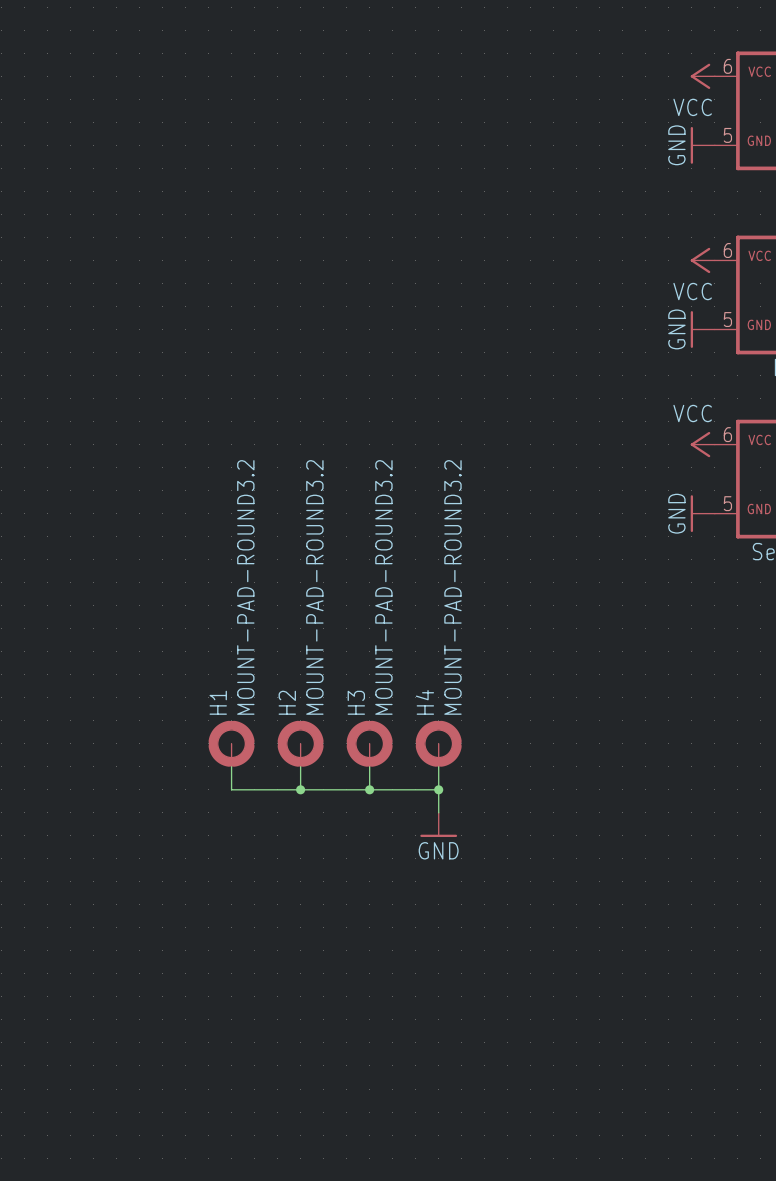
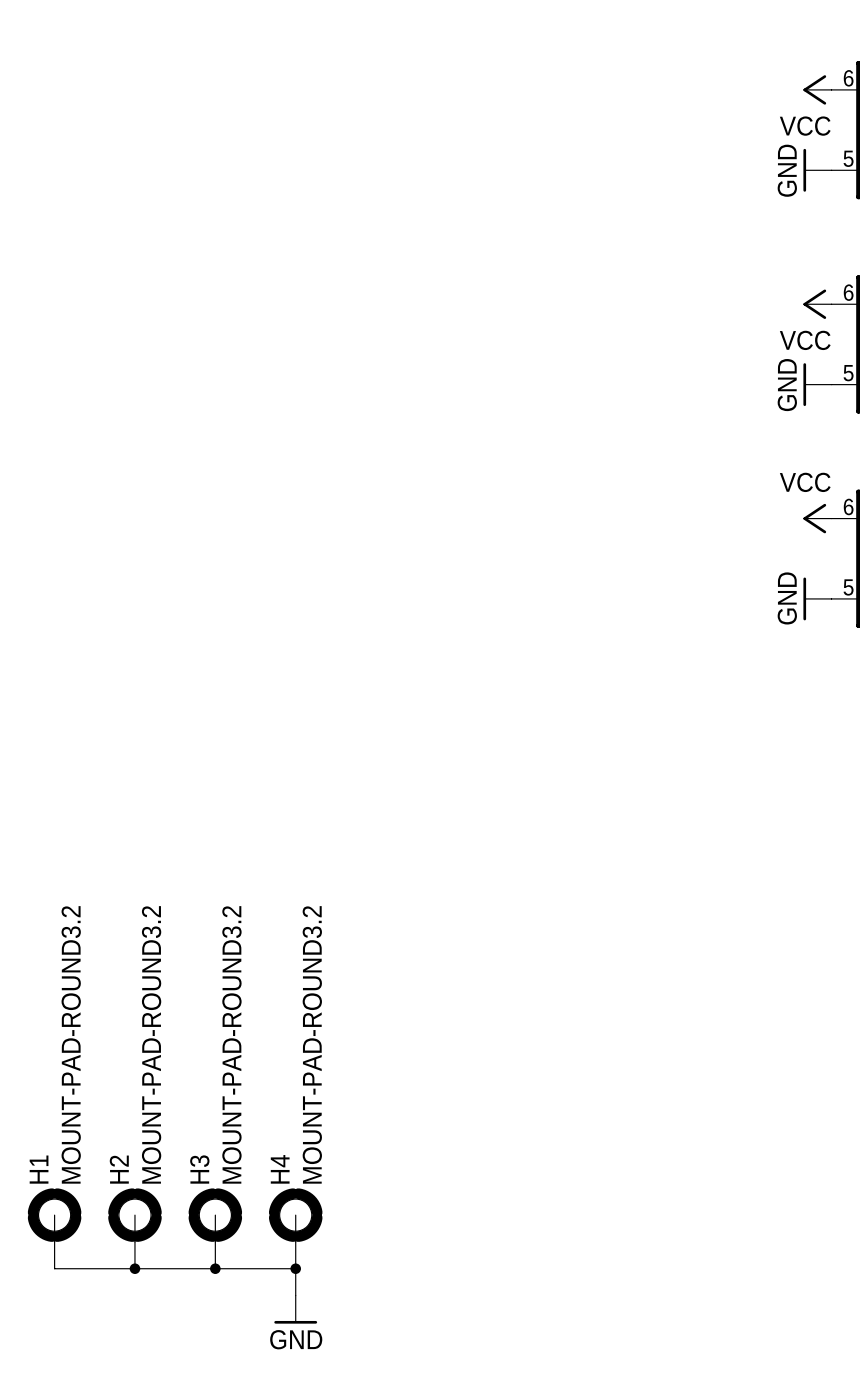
H1 position: (231, 743) -> (54, 1215)
H2 position: (300, 743) -> (134, 1215)
H3 position: (369, 743) -> (215, 1215)
H4 position: (438, 743) -> (295, 1215)
wire: (231, 766) (231, 789) (438, 789) -> none
wire: (300, 766) (300, 789) -> none
wire: (369, 766) (369, 789) -> none
wire: (438, 766) (438, 812) -> none
junction: (300, 789) -> none
junction: (369, 789) -> none
junction: (438, 789) -> none
power symbol: GND (438, 824) -> none
wire: none -> (54, 1241) (54, 1268) (295, 1268)
wire: none -> (134, 1241) (134, 1268)
wire: none -> (215, 1241) (215, 1268)
wire: none -> (295, 1241) (295, 1295)
junction: none -> (134, 1268)
junction: none -> (215, 1268)
junction: none -> (295, 1268)
power symbol: none -> GND (295, 1309)

